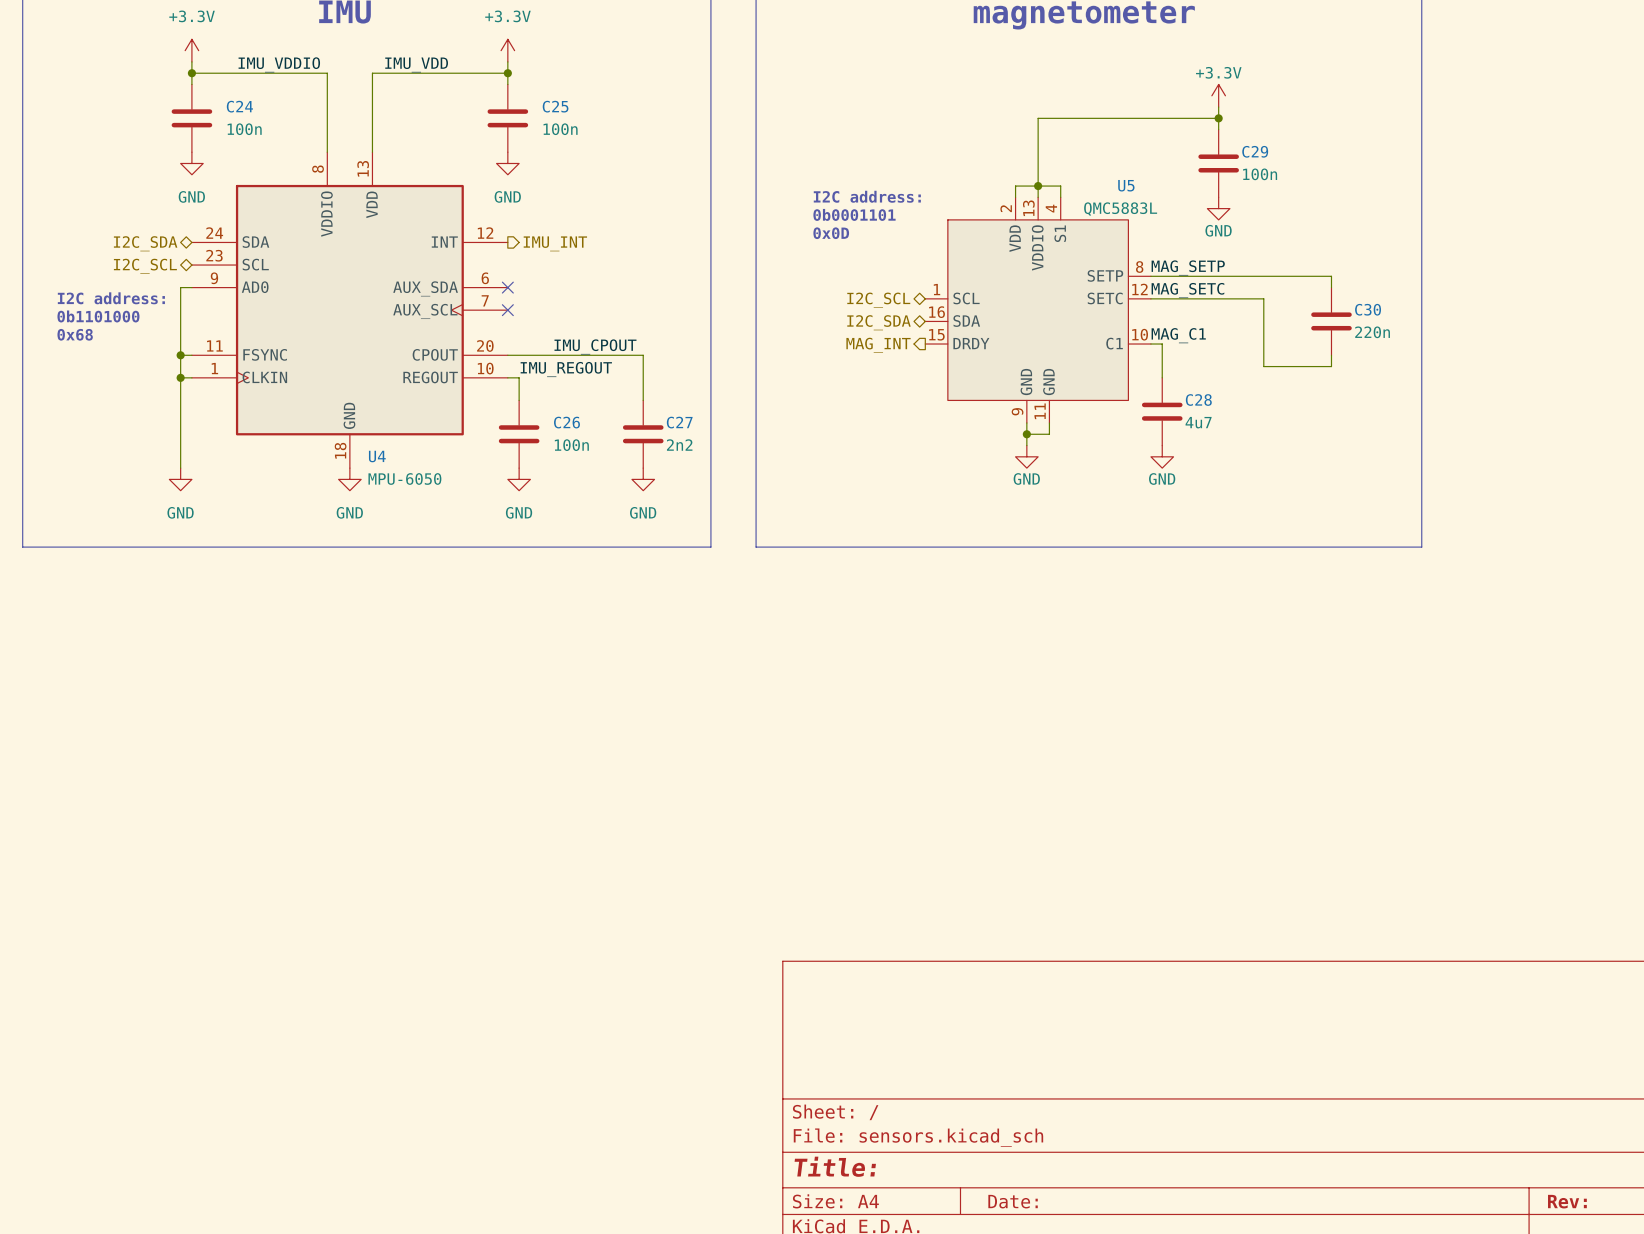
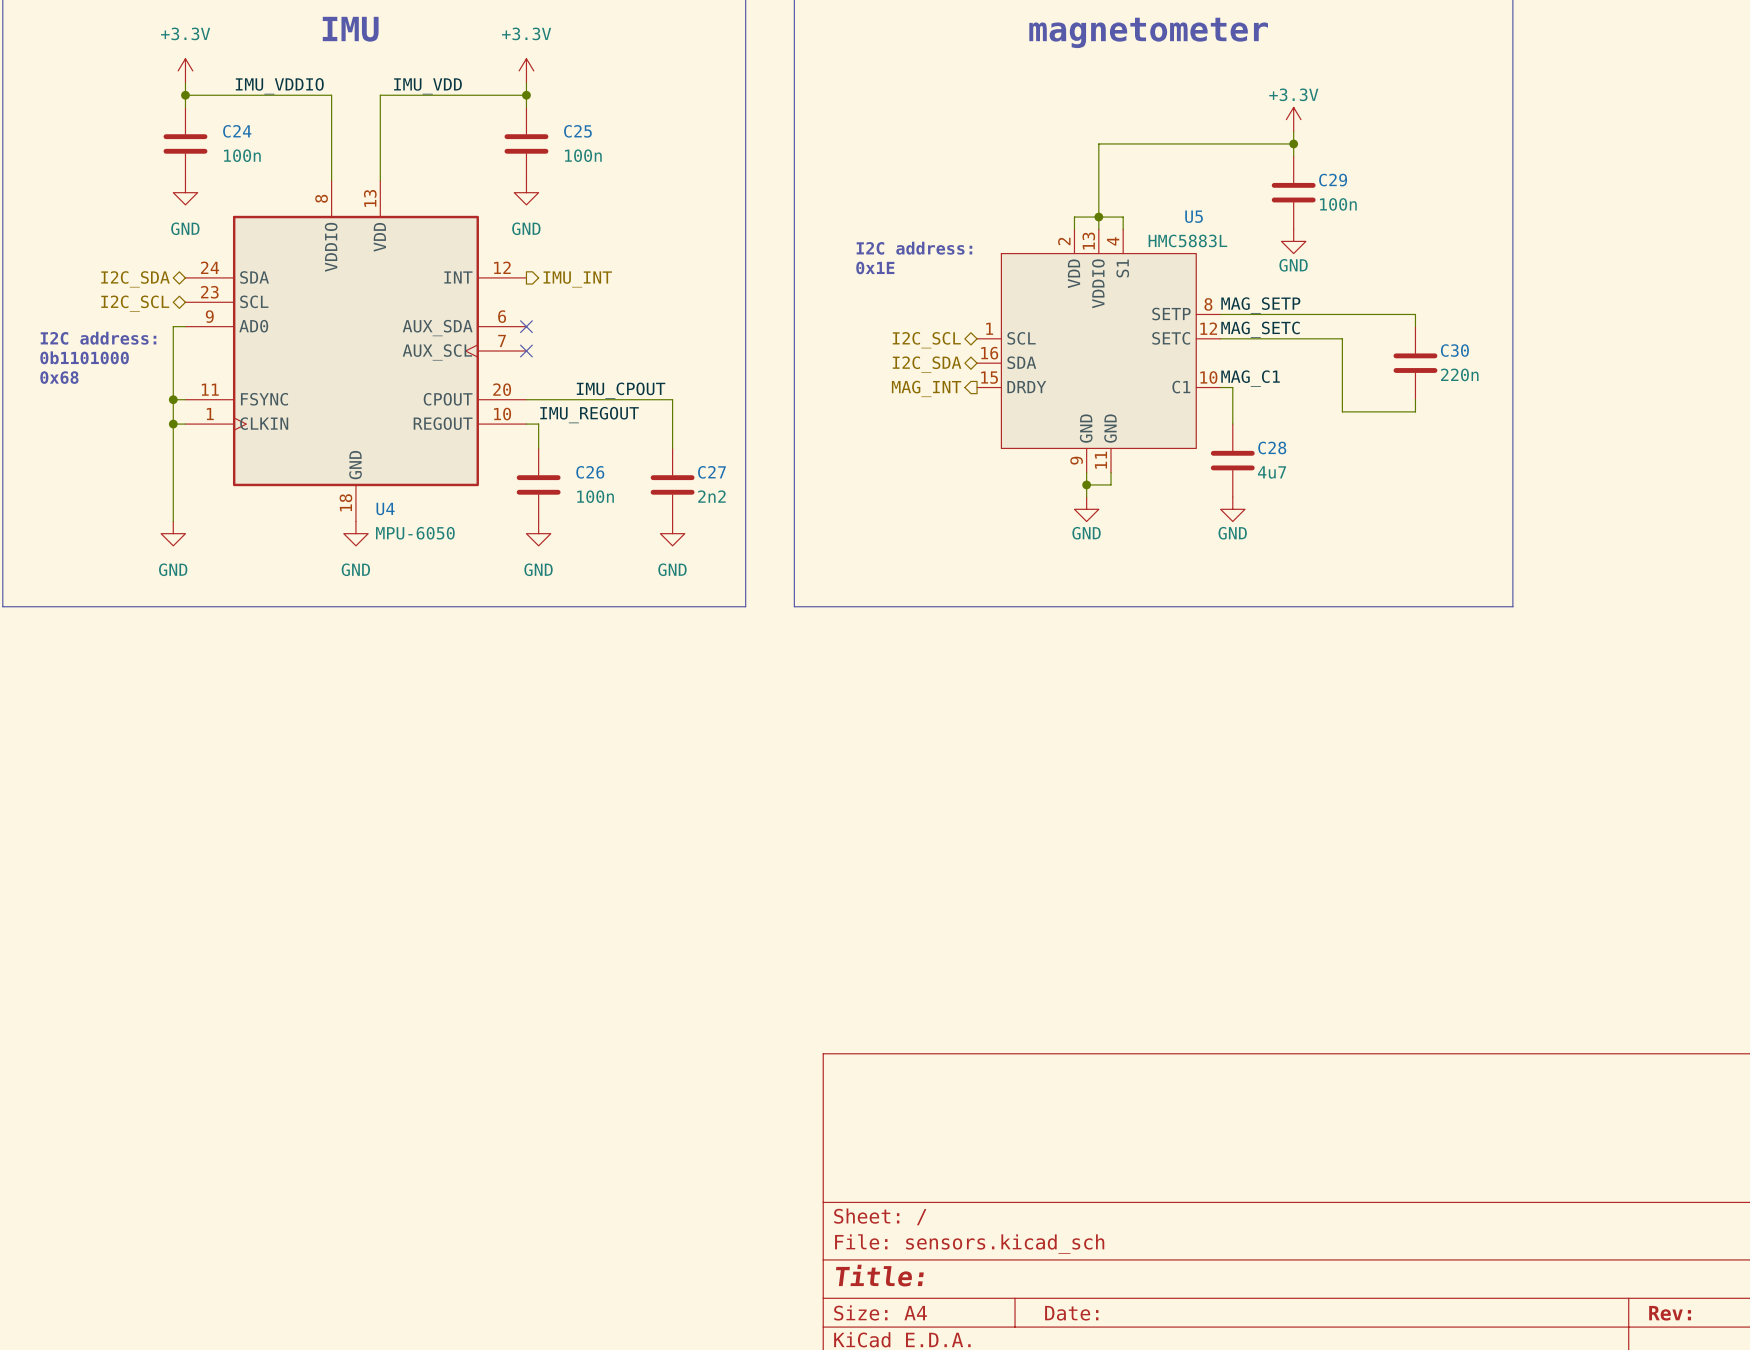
text: I2C address: (867, 196) -> none
U5 value: QMC5883L (1120, 209) -> HMC5883L (1187, 240)
text: 0b0001101 (854, 214) -> I2C address: (914, 248)
text: 0x0D (831, 233) -> 0x1E (875, 267)

